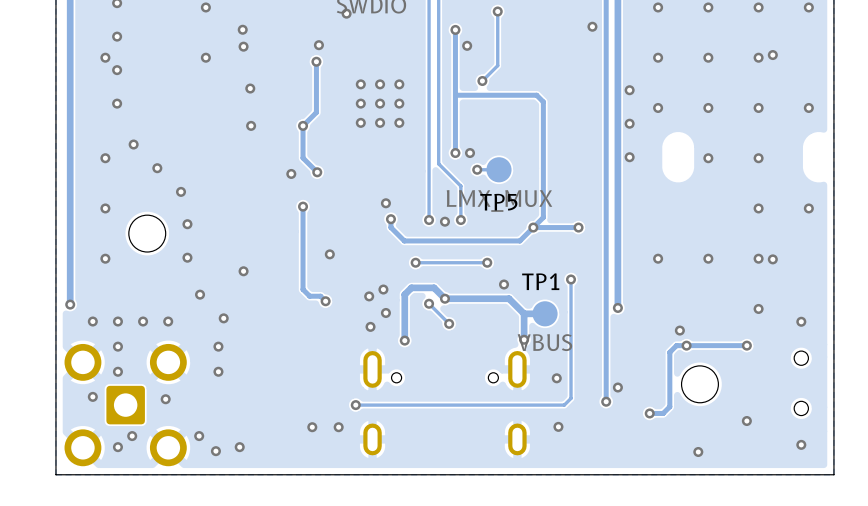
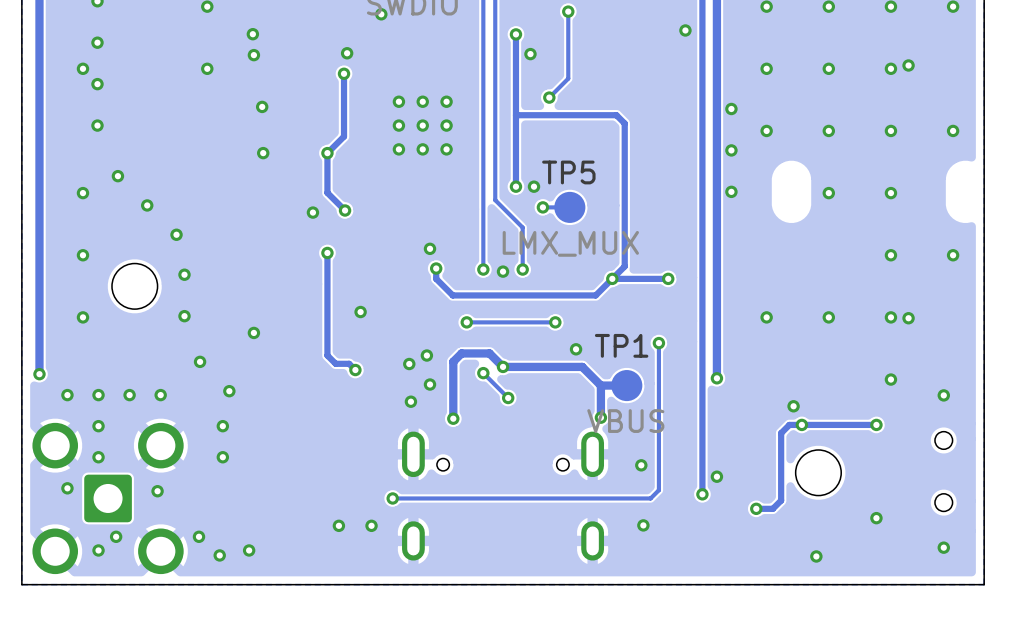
TP5 name position: TP5 (498, 202) -> TP5 (568, 172)

